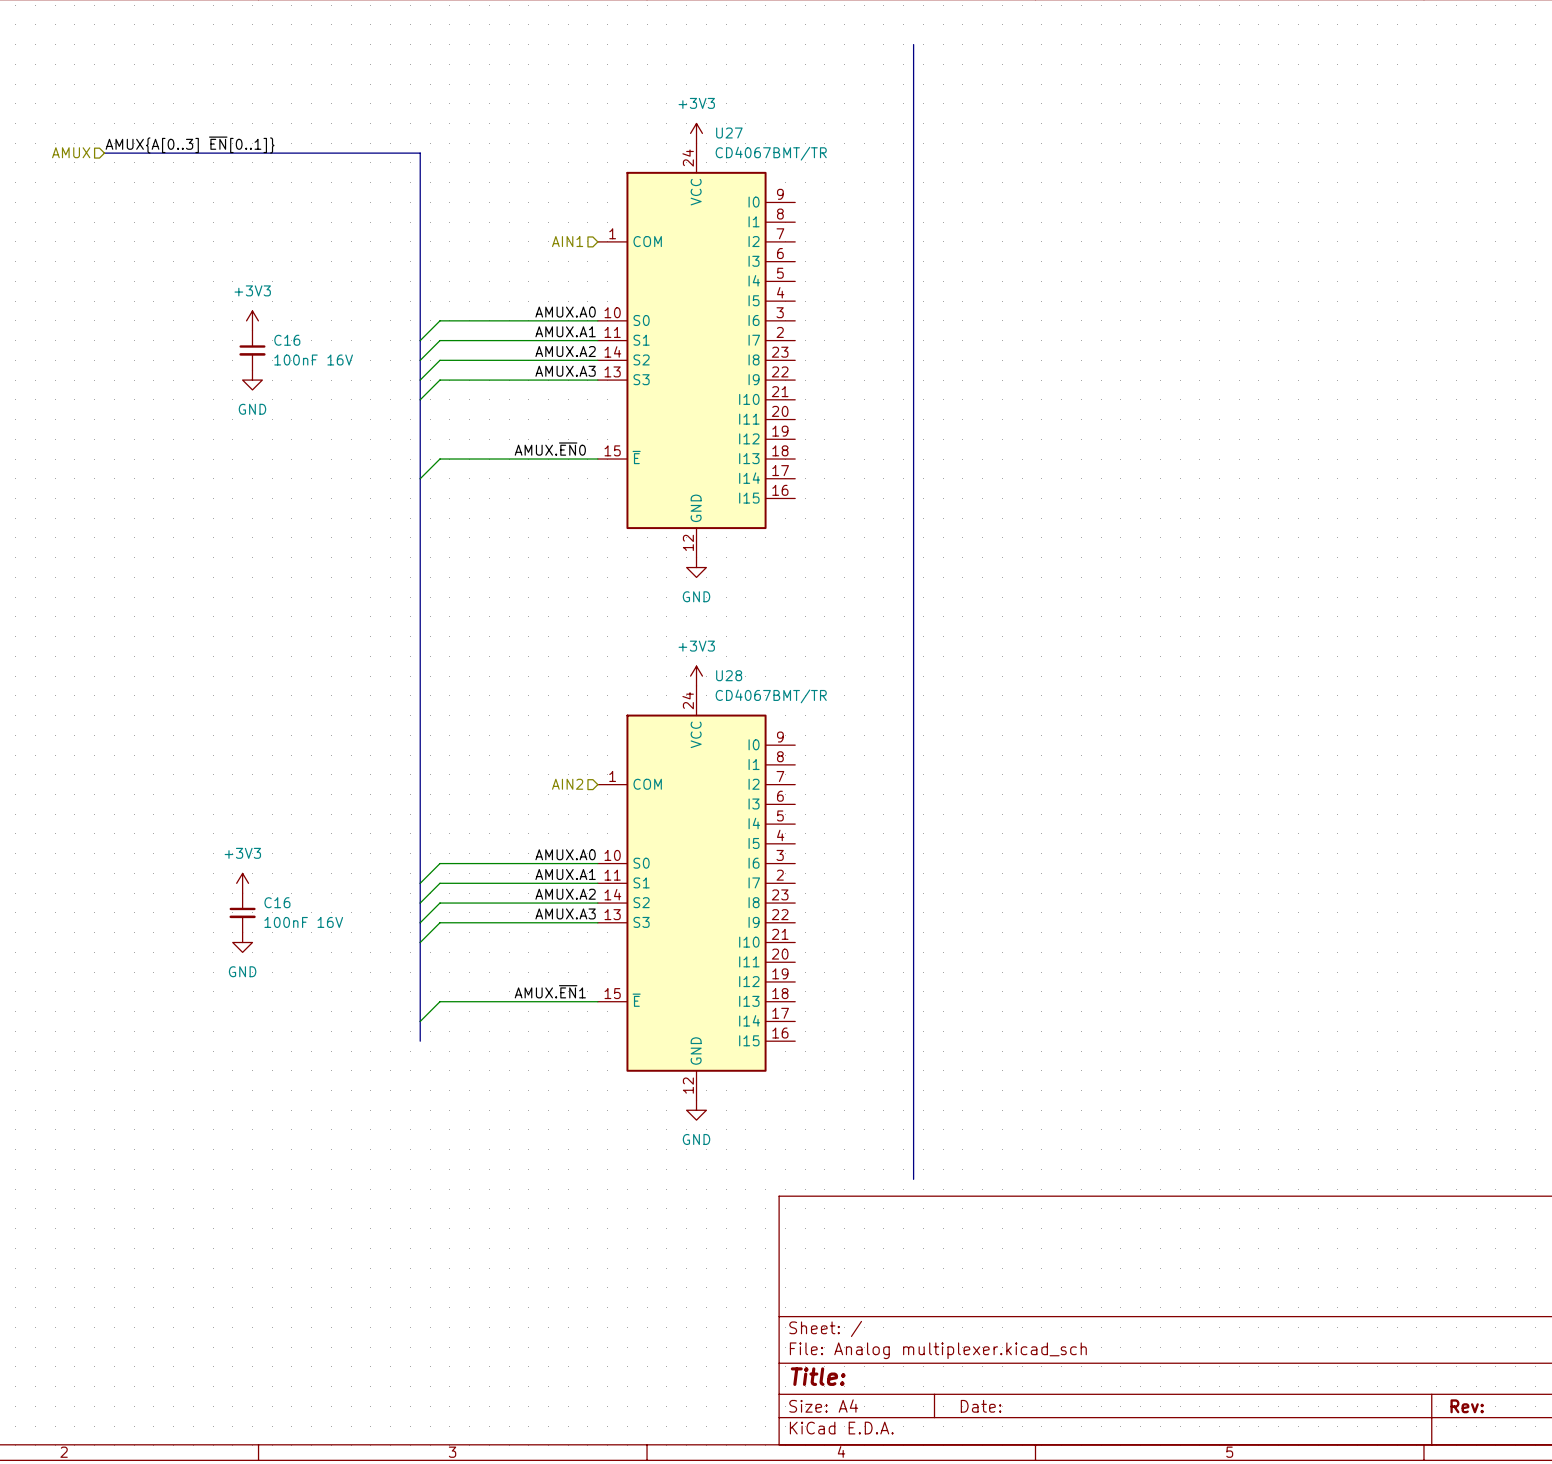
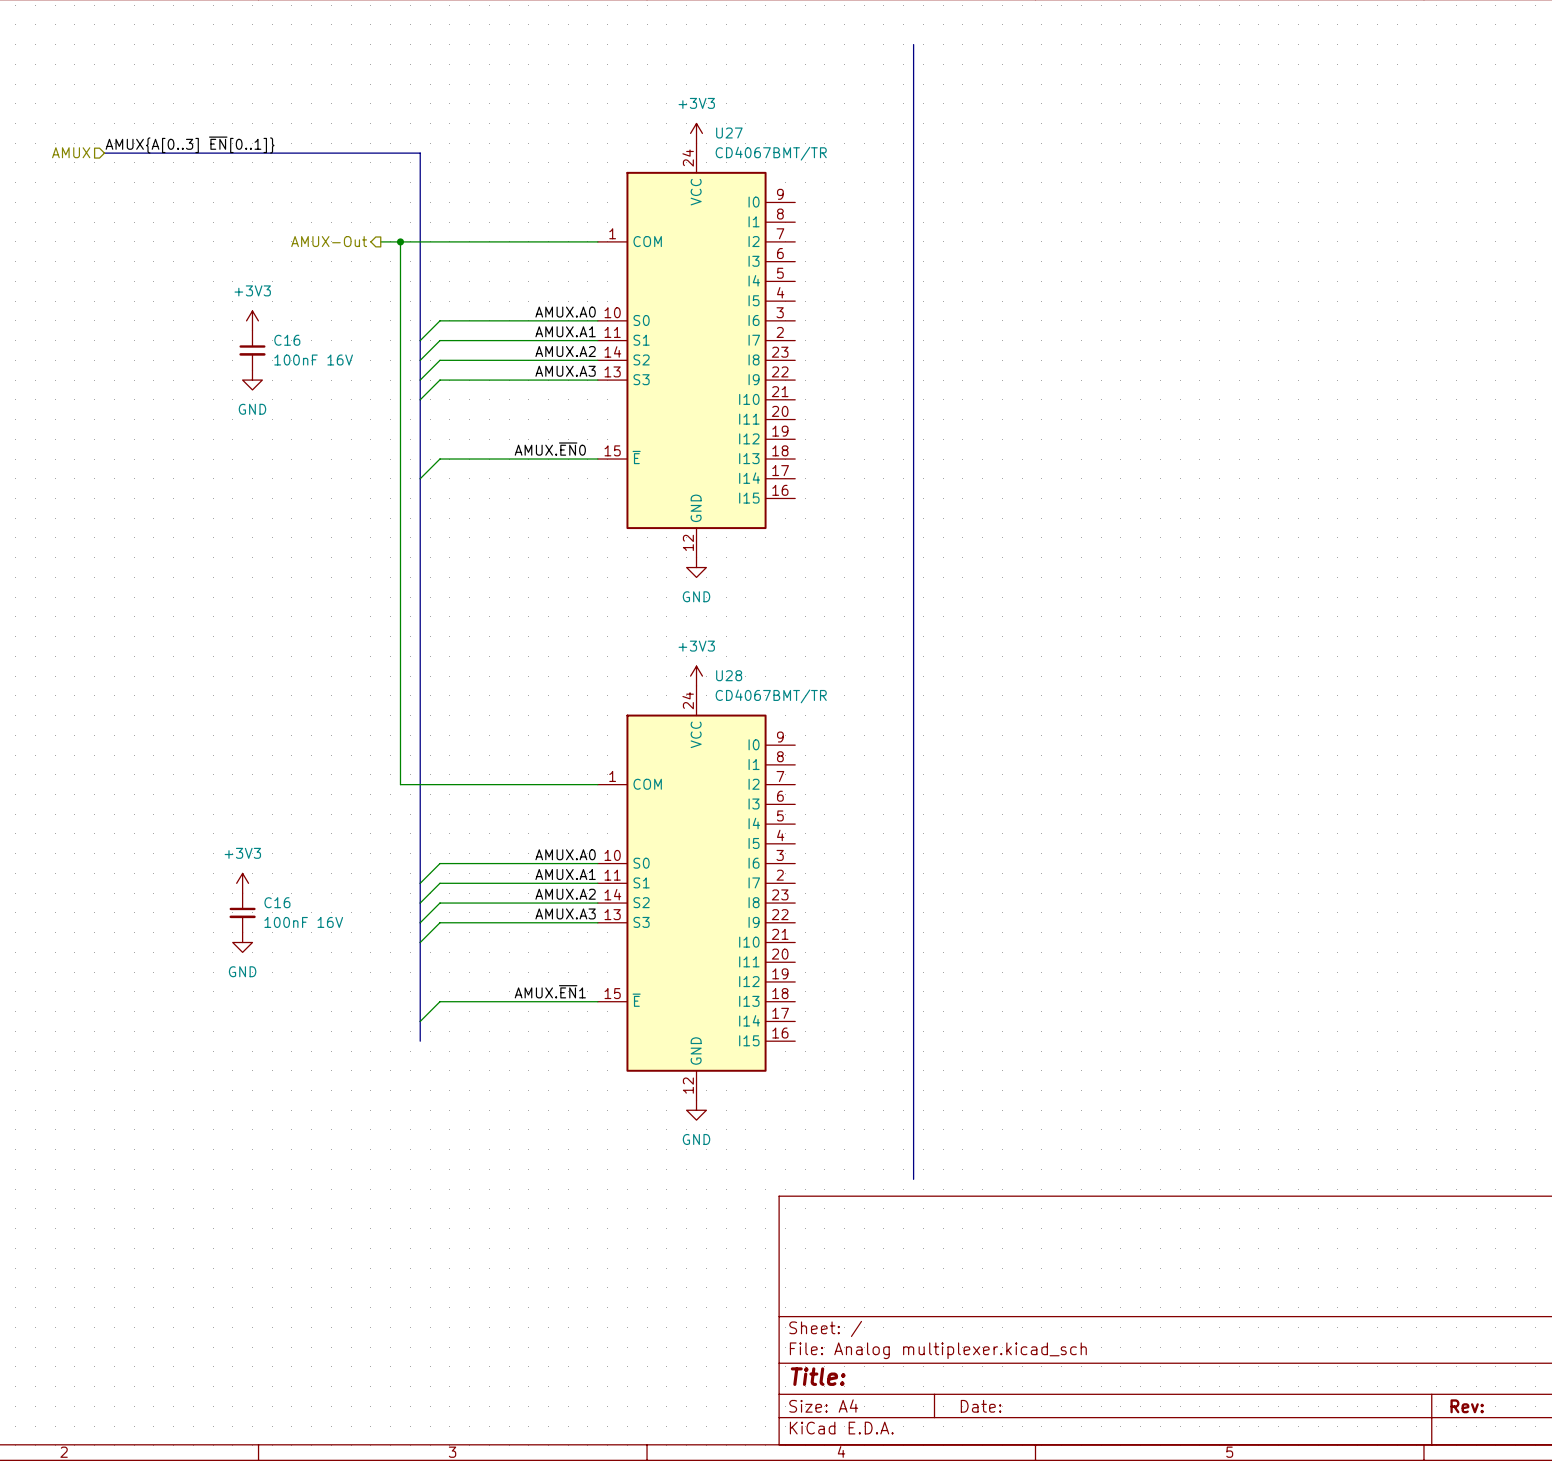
hierarchical label: none -> AMUX-Out (329, 241)
wire: none -> (380, 241) (597, 241)
wire: none -> (400, 241) (400, 784) (597, 784)
junction: none -> (400, 241)
hierarchical label: AIN1 (567, 241) -> none
hierarchical label: AIN2 (567, 784) -> none

